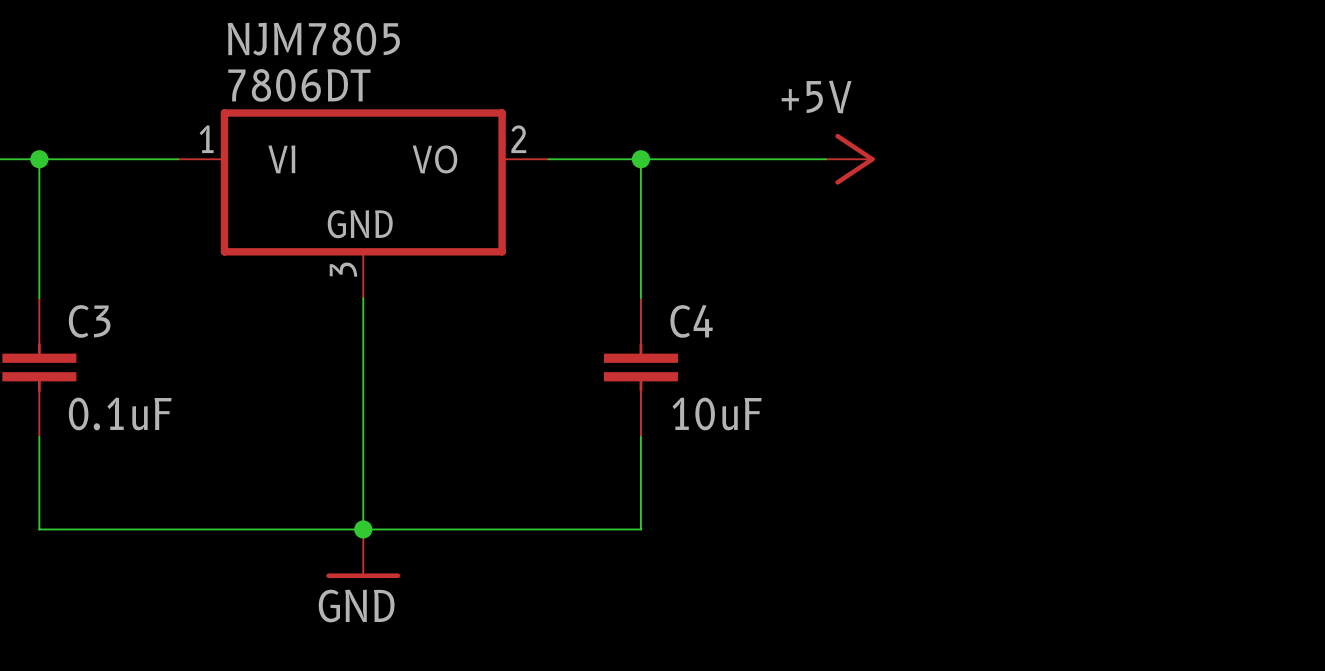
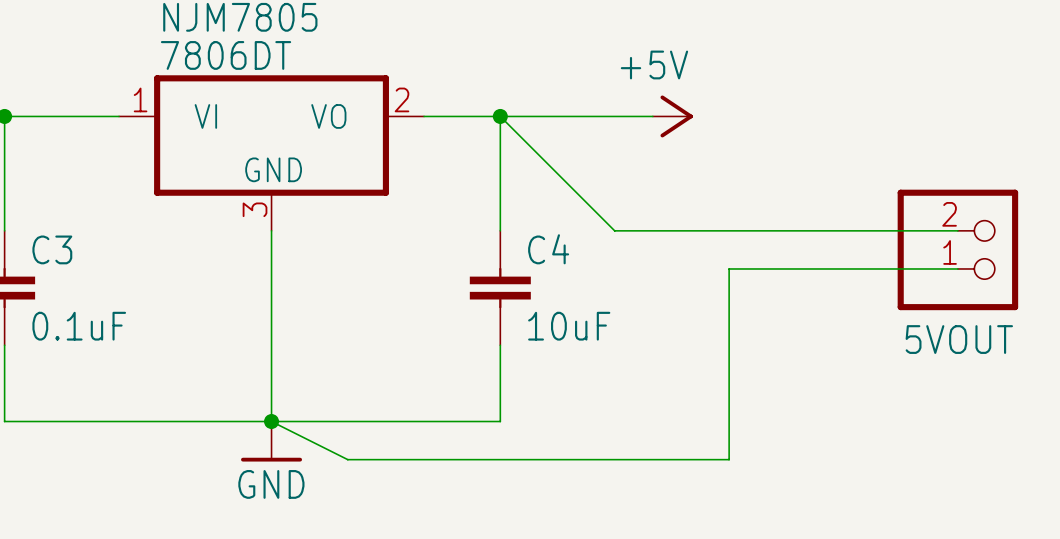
wire: none -> (500, 116) (614, 230) (957, 230)
5VOUT: none -> (957, 249)
wire: none -> (957, 268) (729, 268) (729, 459) (347, 459) (271, 421)

